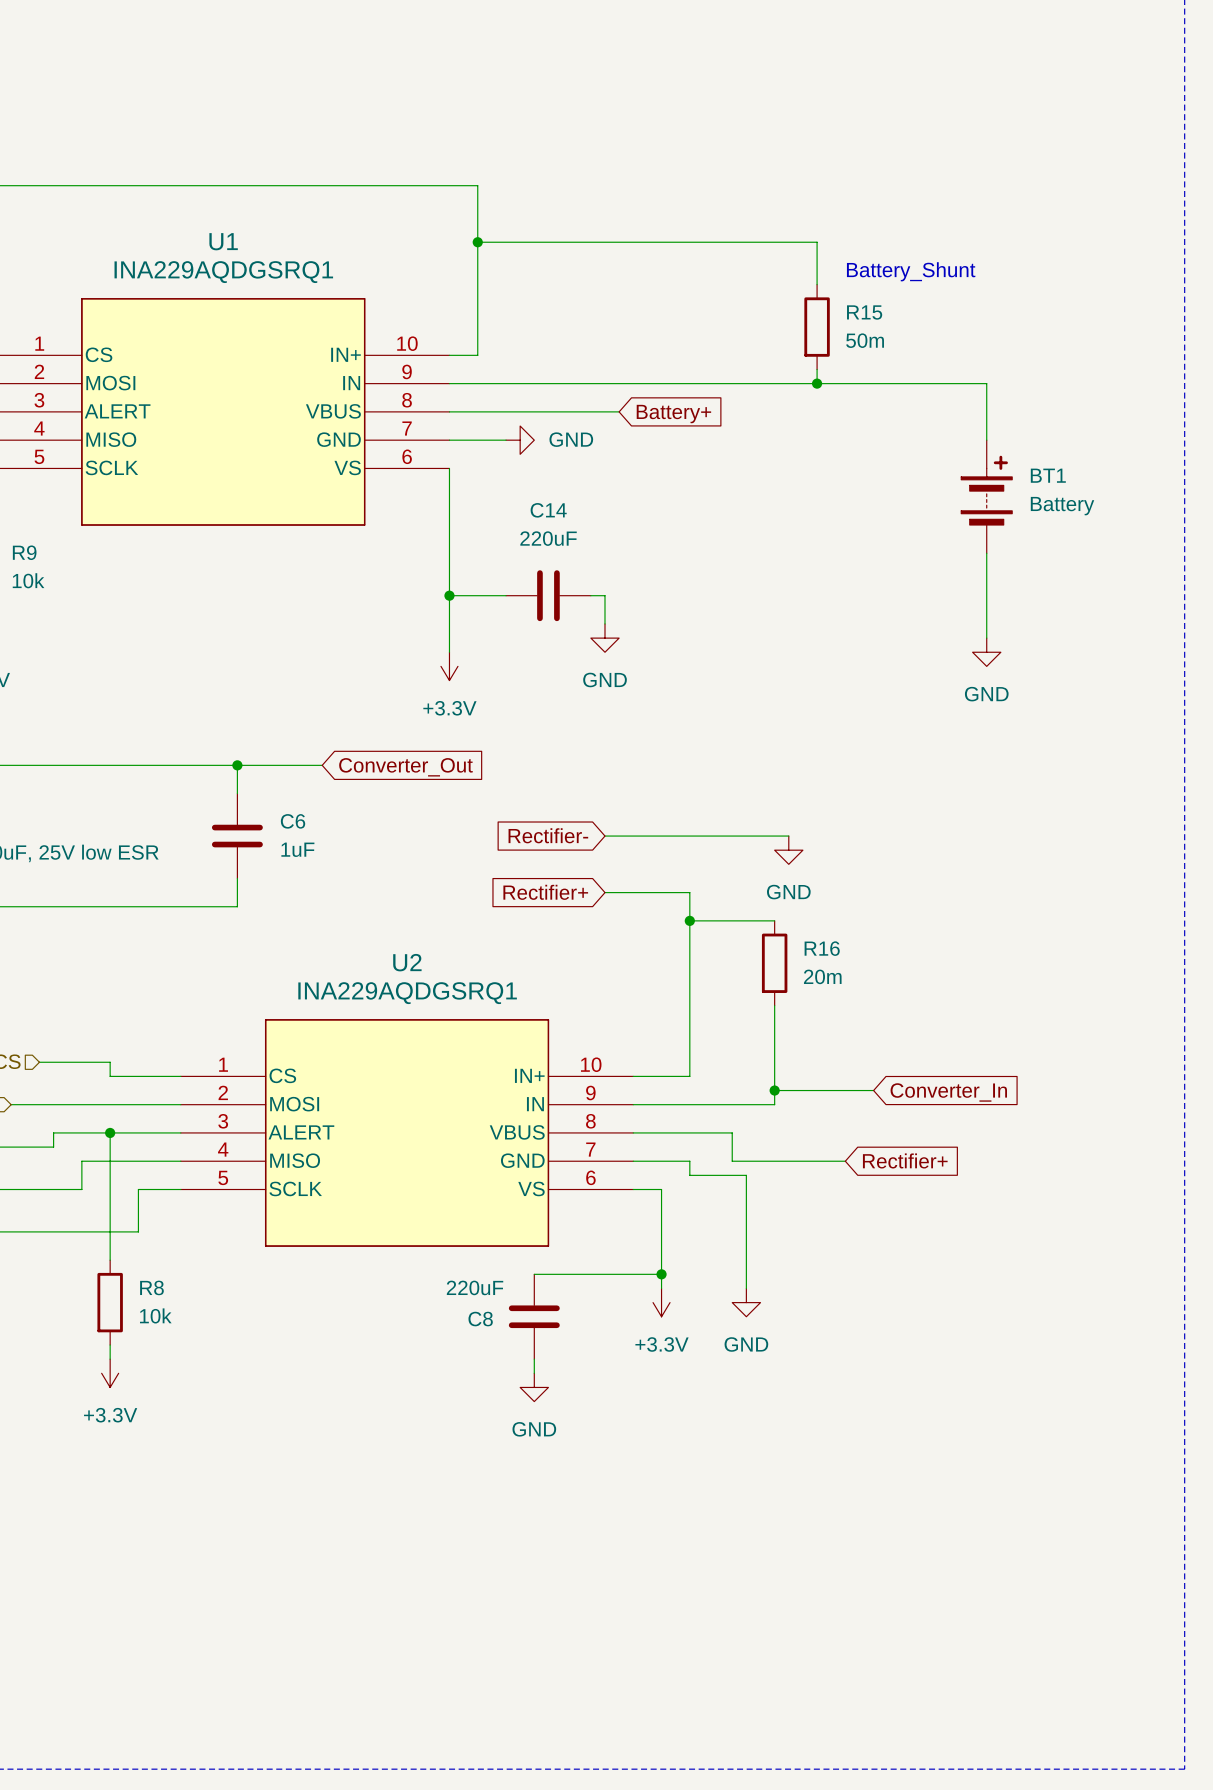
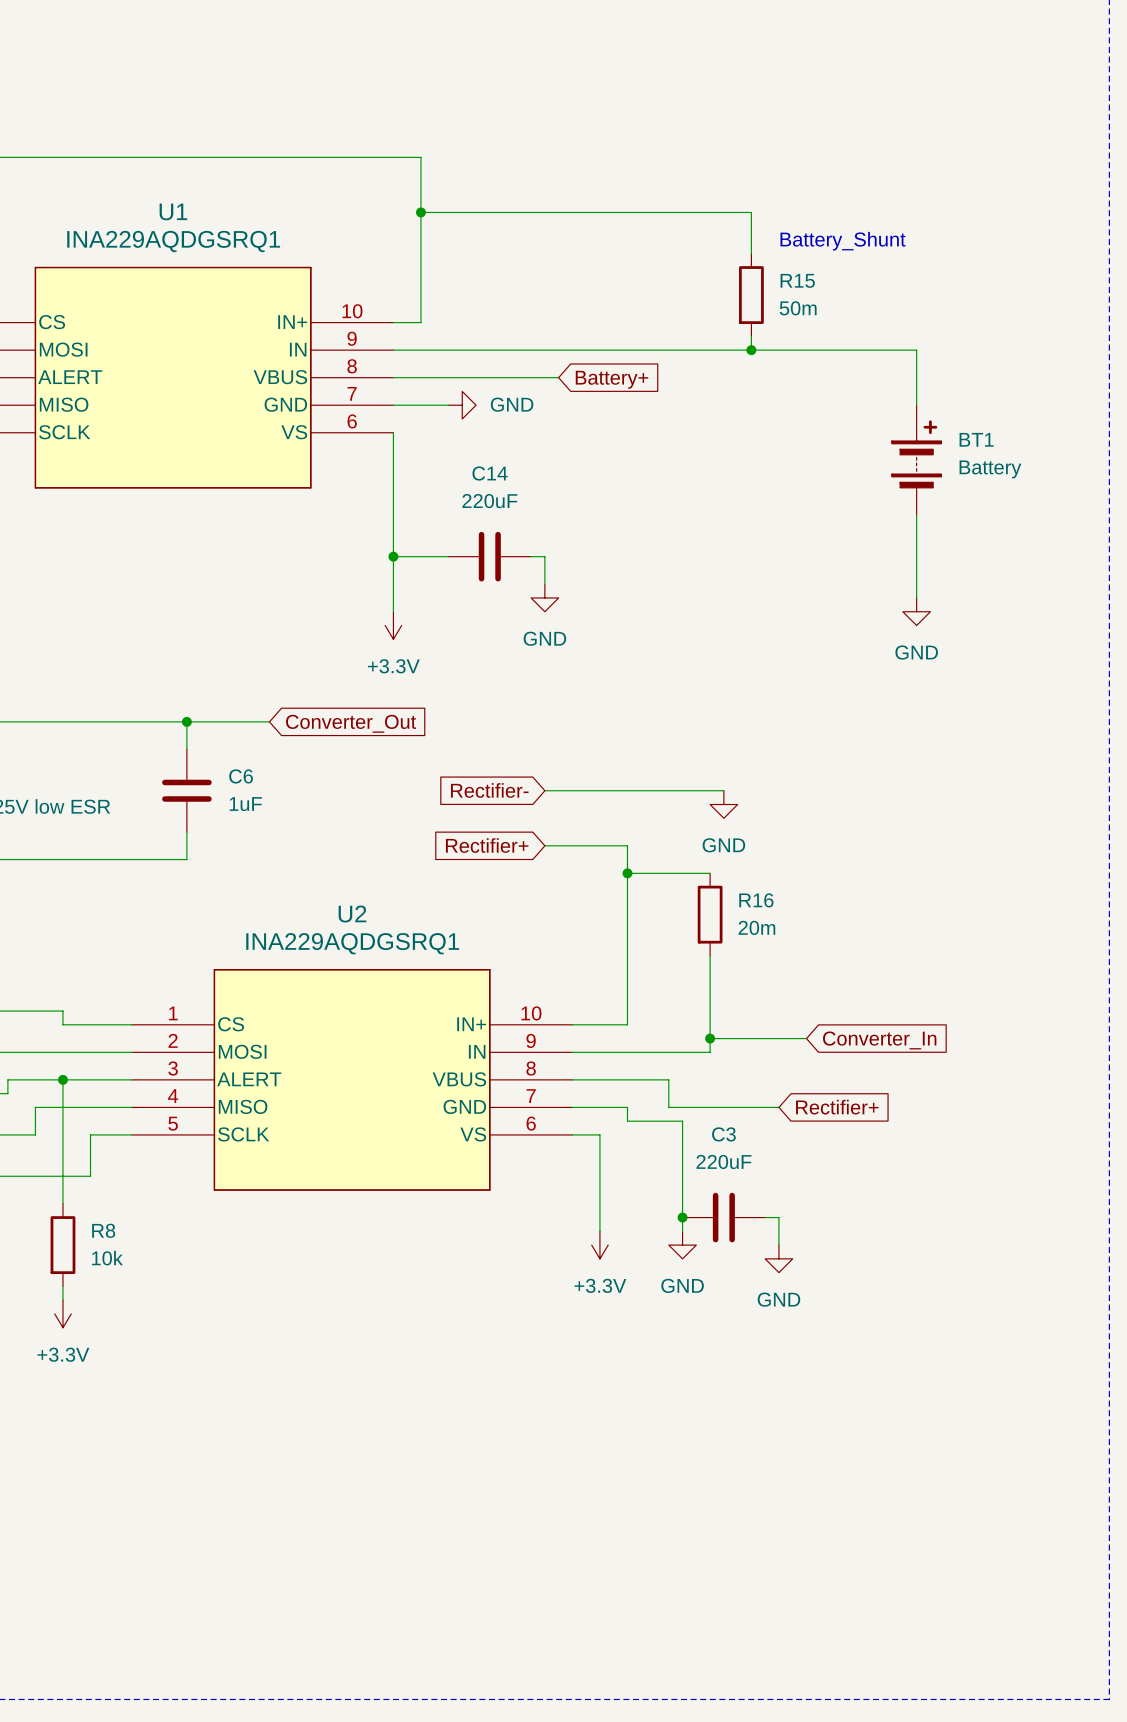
wire: (534, 1274) (661, 1274) -> none
junction: (661, 1274) -> none
junction: none -> (682, 1217)
C3: none -> 220uF (723, 1217)
wire: none -> (765, 1217) (778, 1217) (778, 1245)
C8: 220uF (534, 1316) -> none
power symbol: none -> GND (778, 1258)
wire: (534, 1359) (534, 1373) -> none
power symbol: GND (534, 1387) -> none

